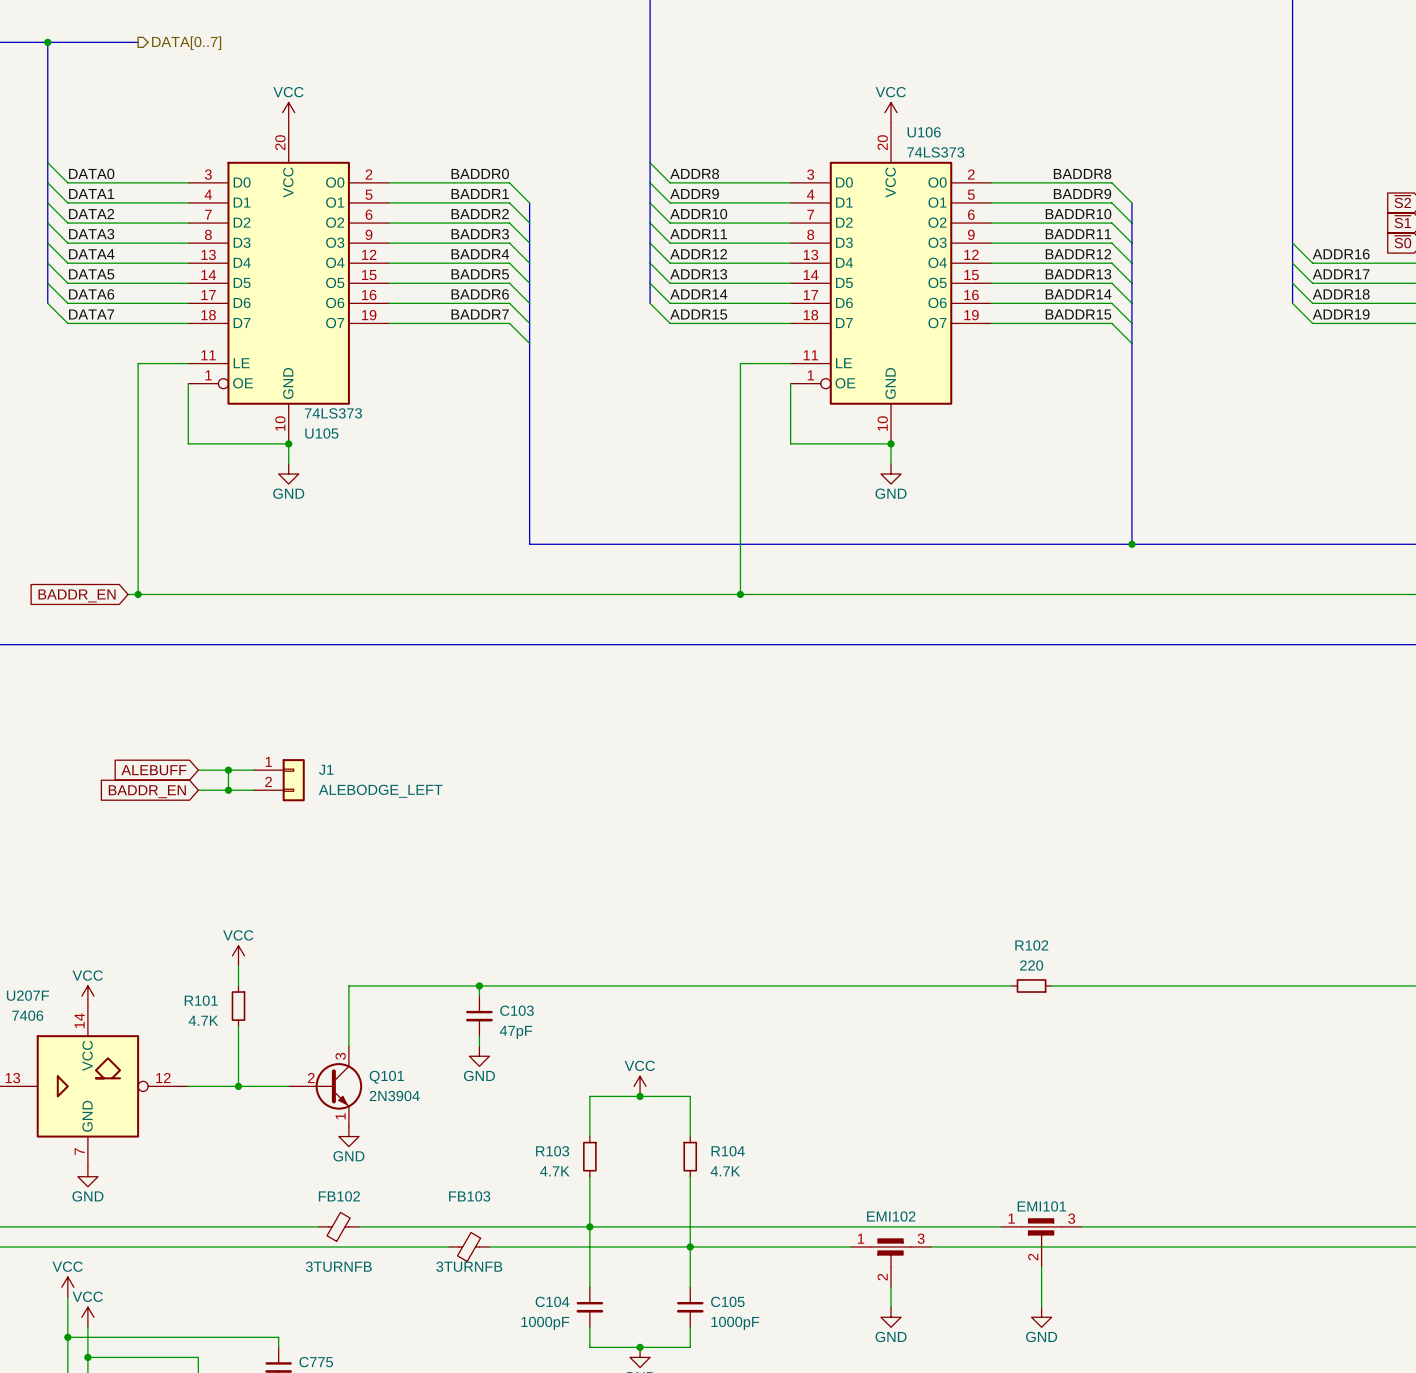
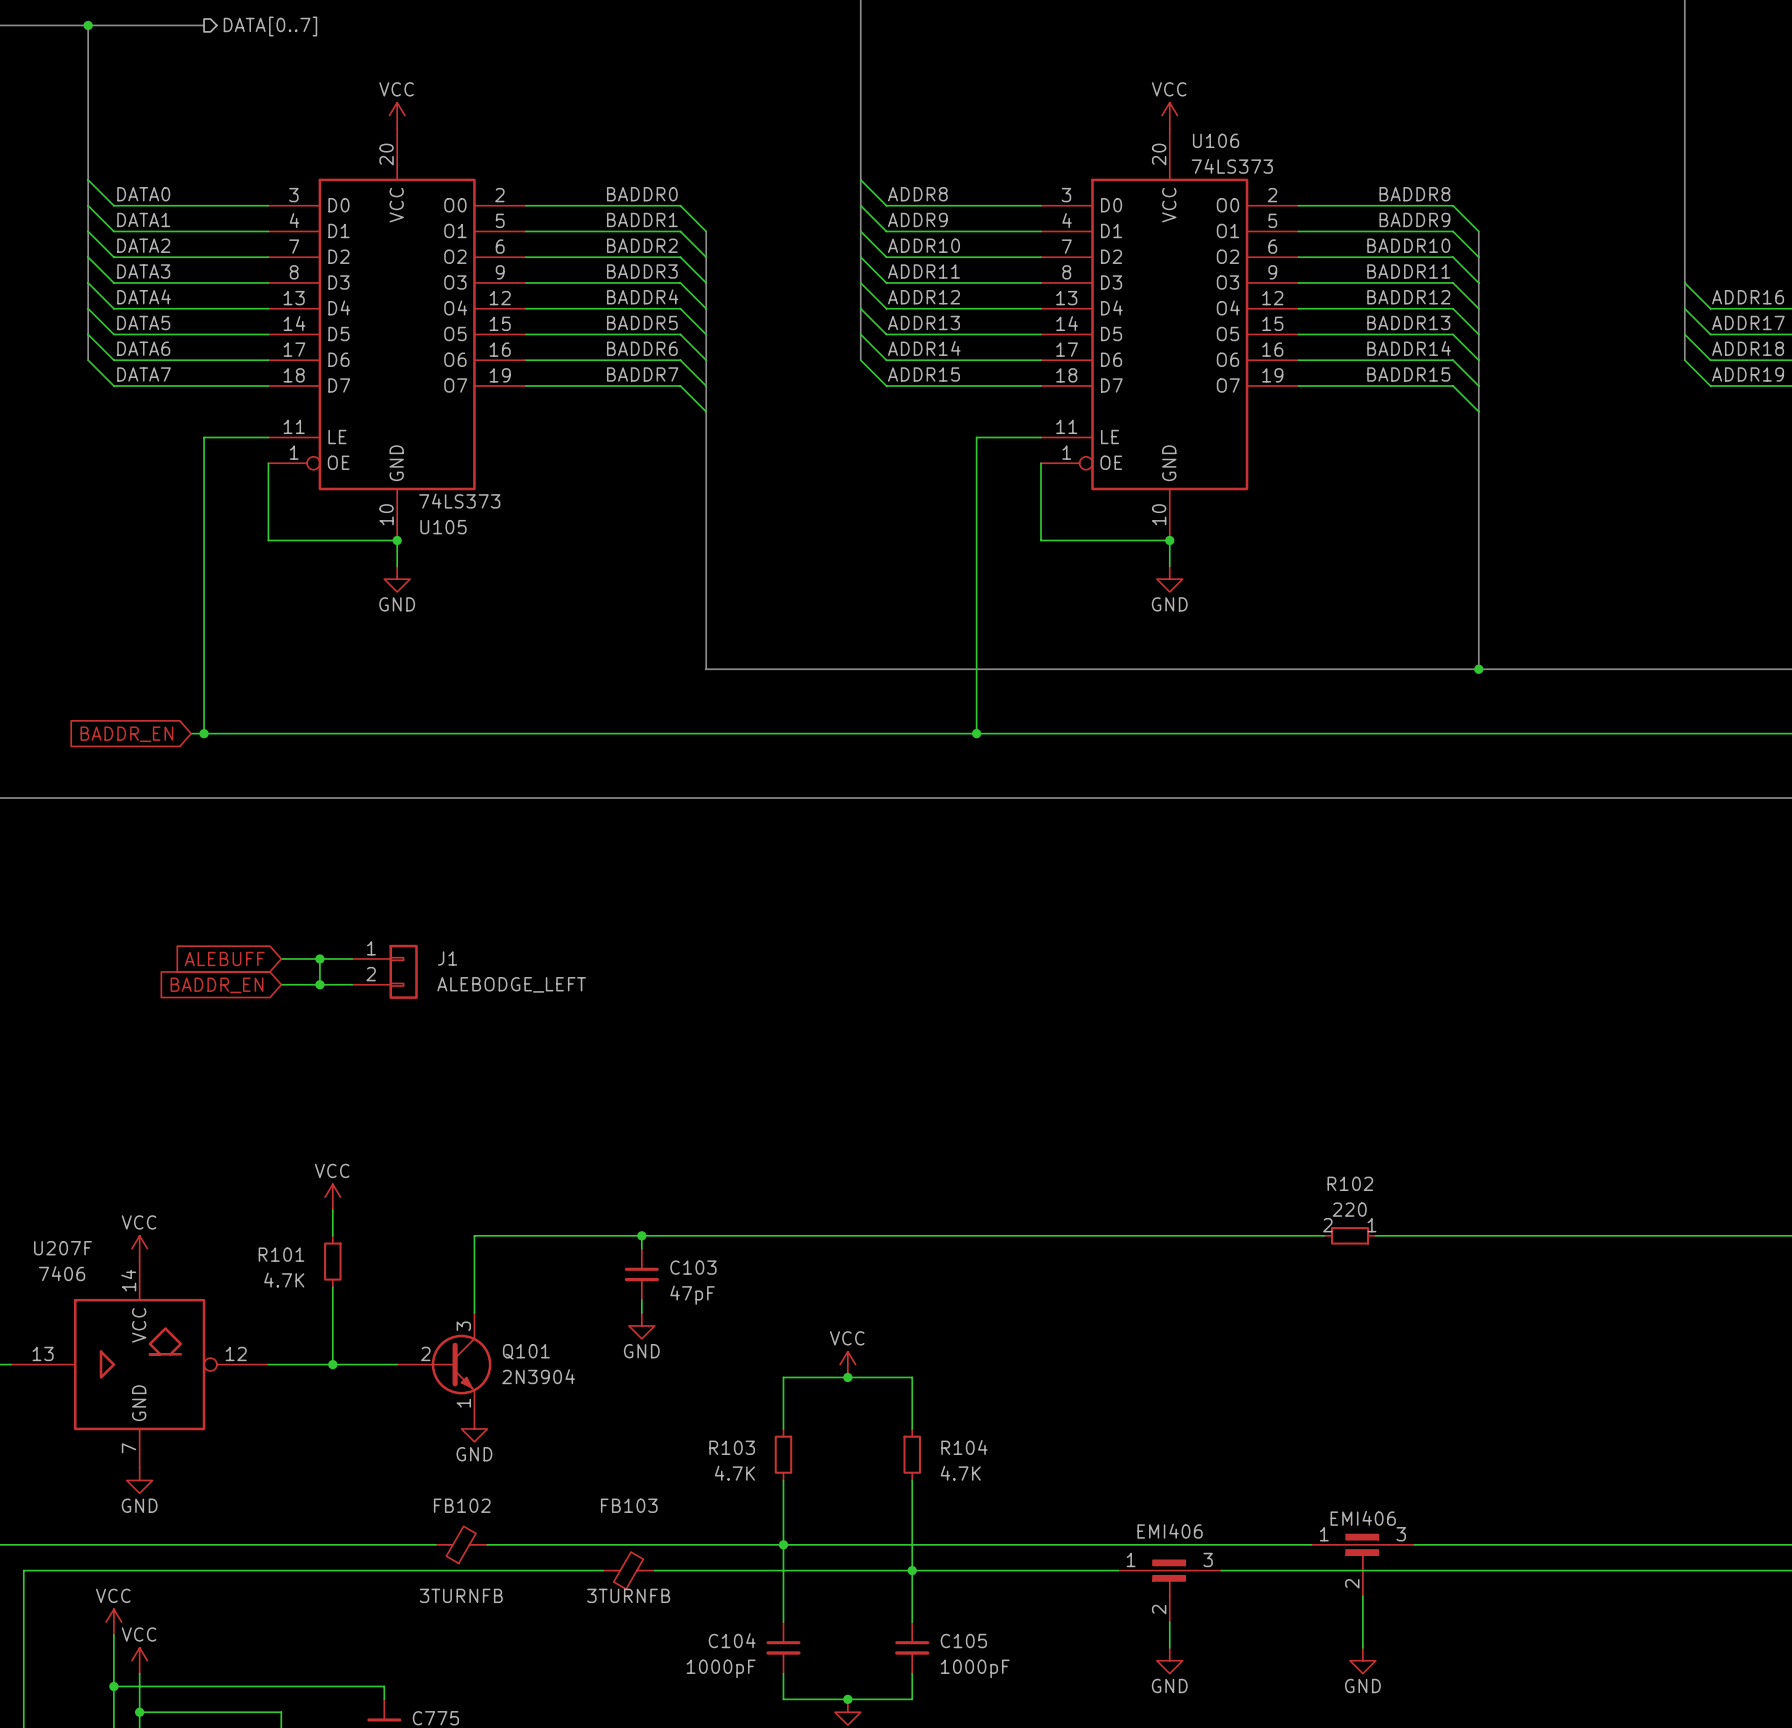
R102 pin number: none -> 2 (1327, 1225)
R102 pin number: none -> 1 (1371, 1225)
EMI101 name: EMI101 (1041, 1206) -> EMI406 (1363, 1518)
EMI102 name: EMI102 (891, 1216) -> EMI406 (1170, 1531)

